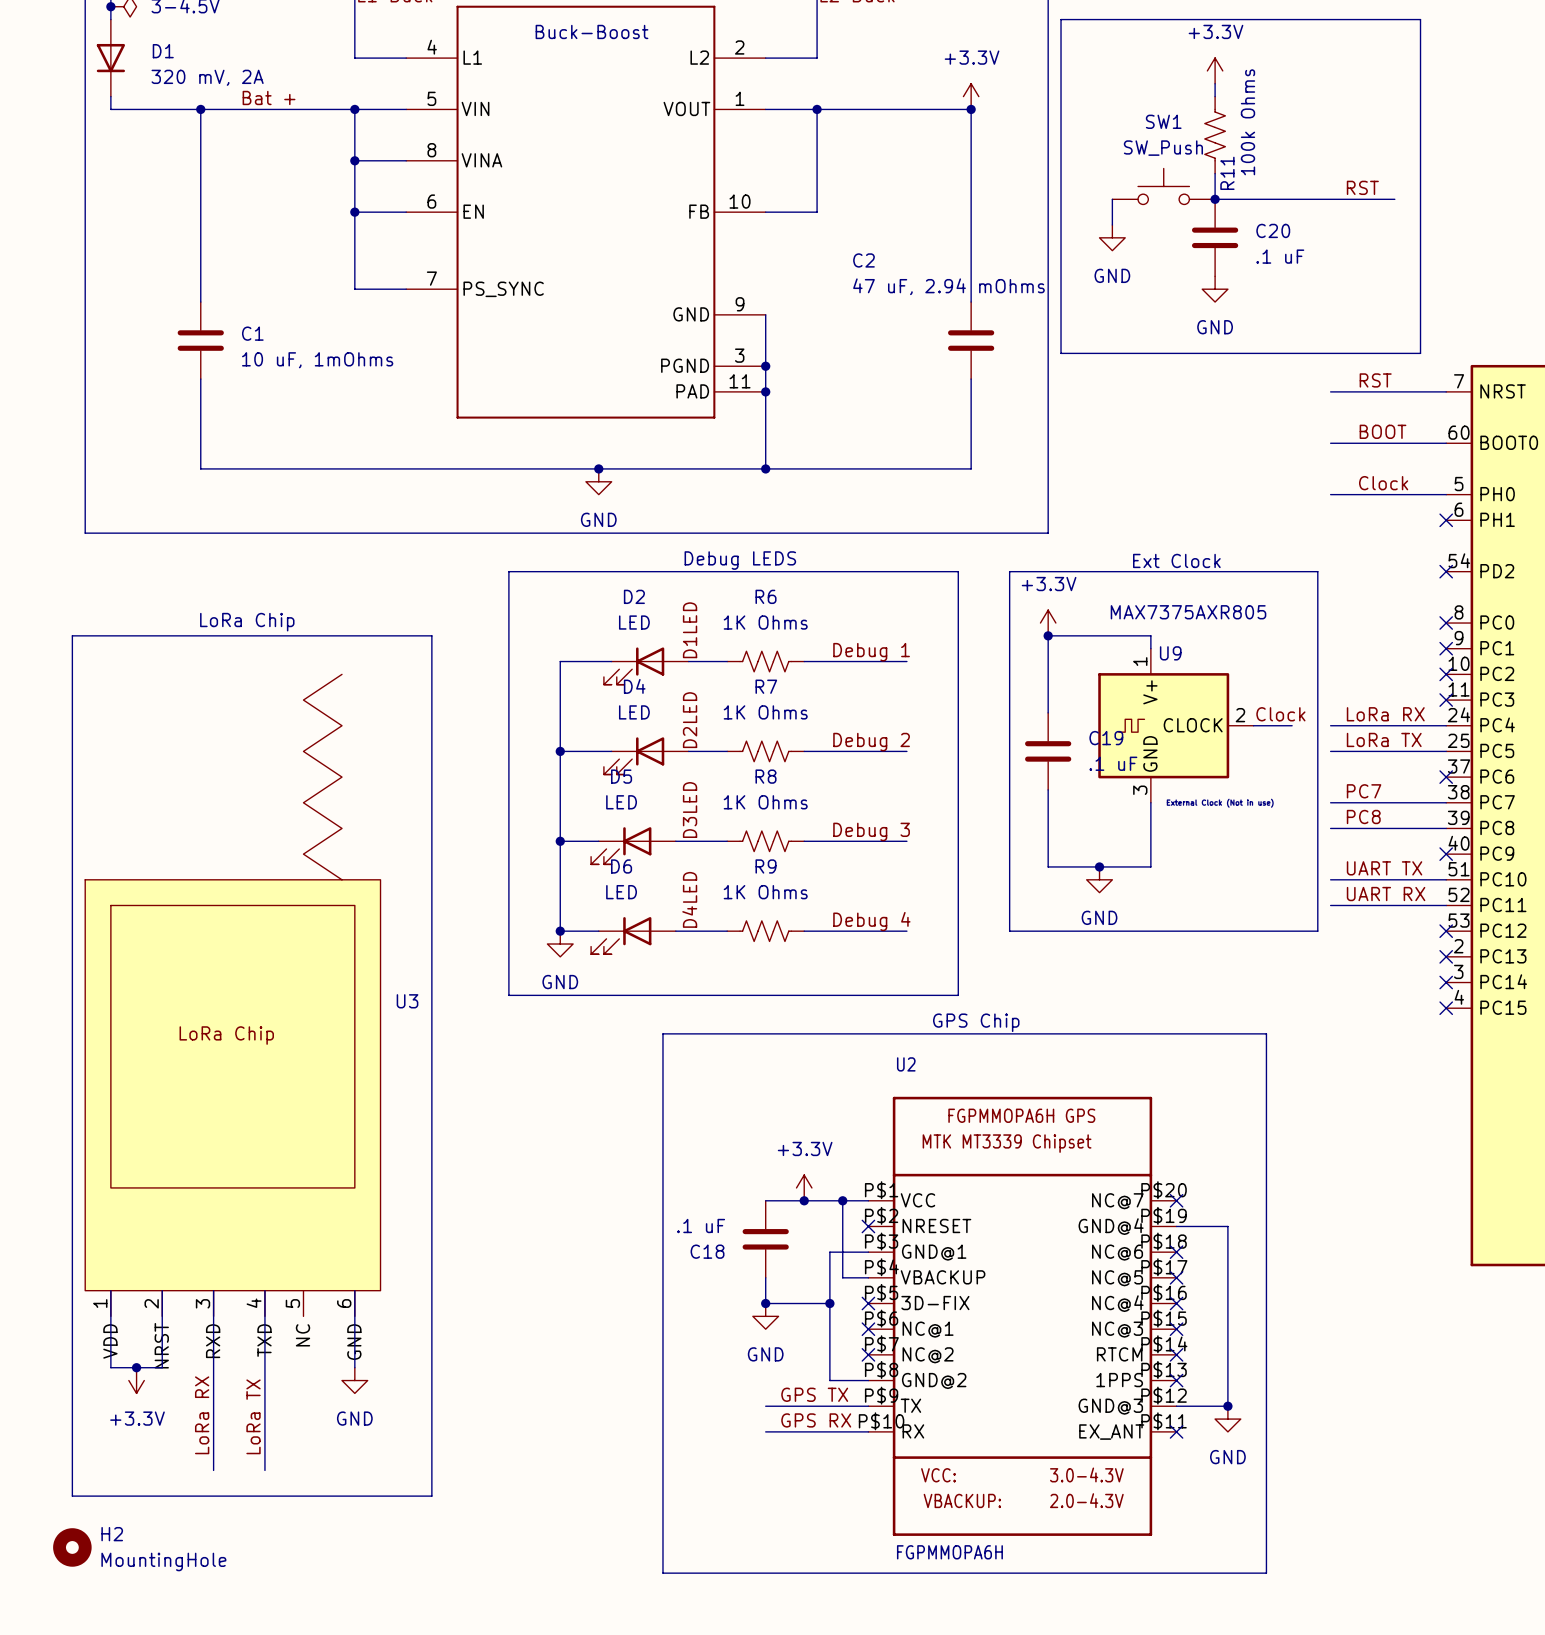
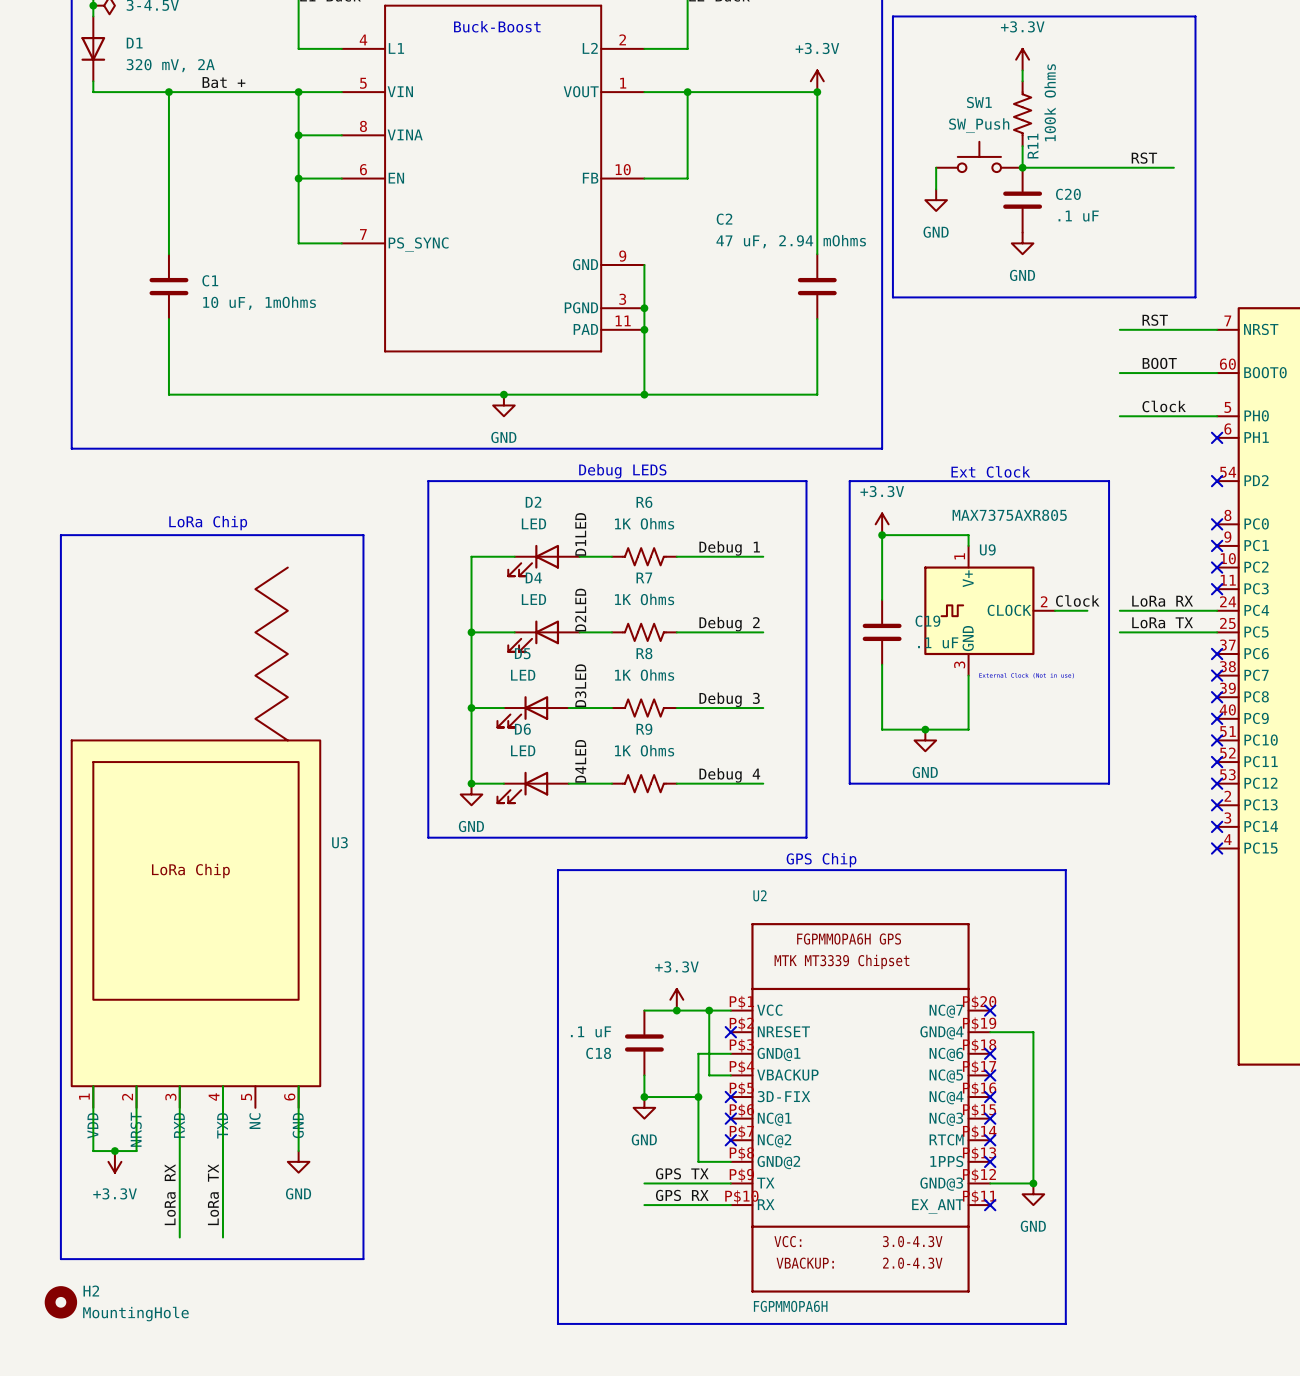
label: PC7 (1364, 791) -> none
wire: (1330, 802) (1446, 802) -> none
no-connect mark: none -> (1217, 675)
label: PC8 (1363, 816) -> none
wire: (1330, 828) (1446, 828) -> none
no-connect mark: none -> (1217, 697)
label: UART TX (1384, 868) -> none
wire: (1330, 879) (1446, 879) -> none
no-connect mark: none -> (1217, 740)
label: UART RX (1386, 894) -> none
wire: (1330, 905) (1446, 905) -> none
no-connect mark: none -> (1217, 762)

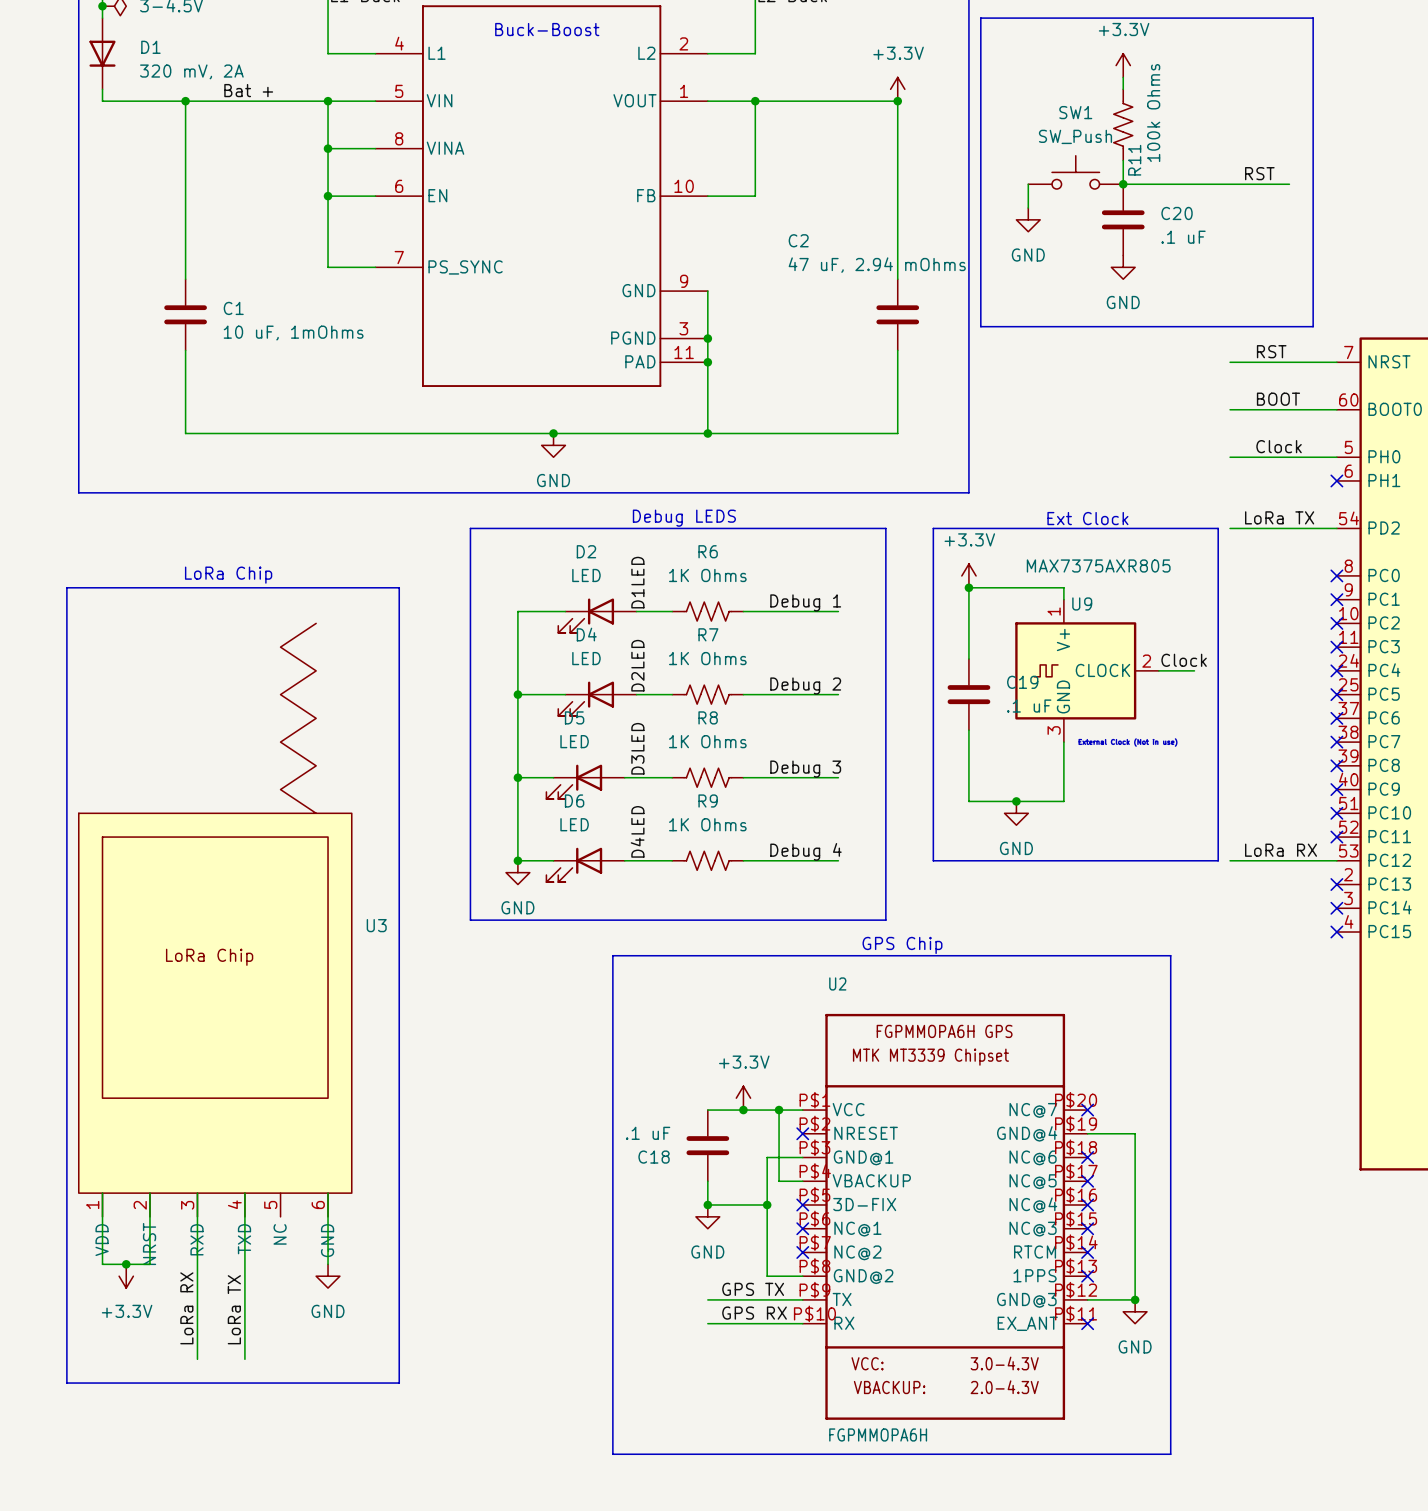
no-connect mark: (1217, 481) -> none
label position: LoRa RX (1162, 601) -> LoRa RX (1281, 850)
wire: (1119, 610) (1217, 610) -> (1230, 528) (1336, 528)
no-connect mark: none -> (1336, 670)
label position: LoRa TX (1162, 622) -> LoRa TX (1279, 517)
wire: (1119, 632) (1217, 632) -> (1230, 860) (1336, 860)
no-connect mark: none -> (1336, 694)
no-connect mark: (1217, 783) -> none
H2: MountingHole (60, 1302) -> none

